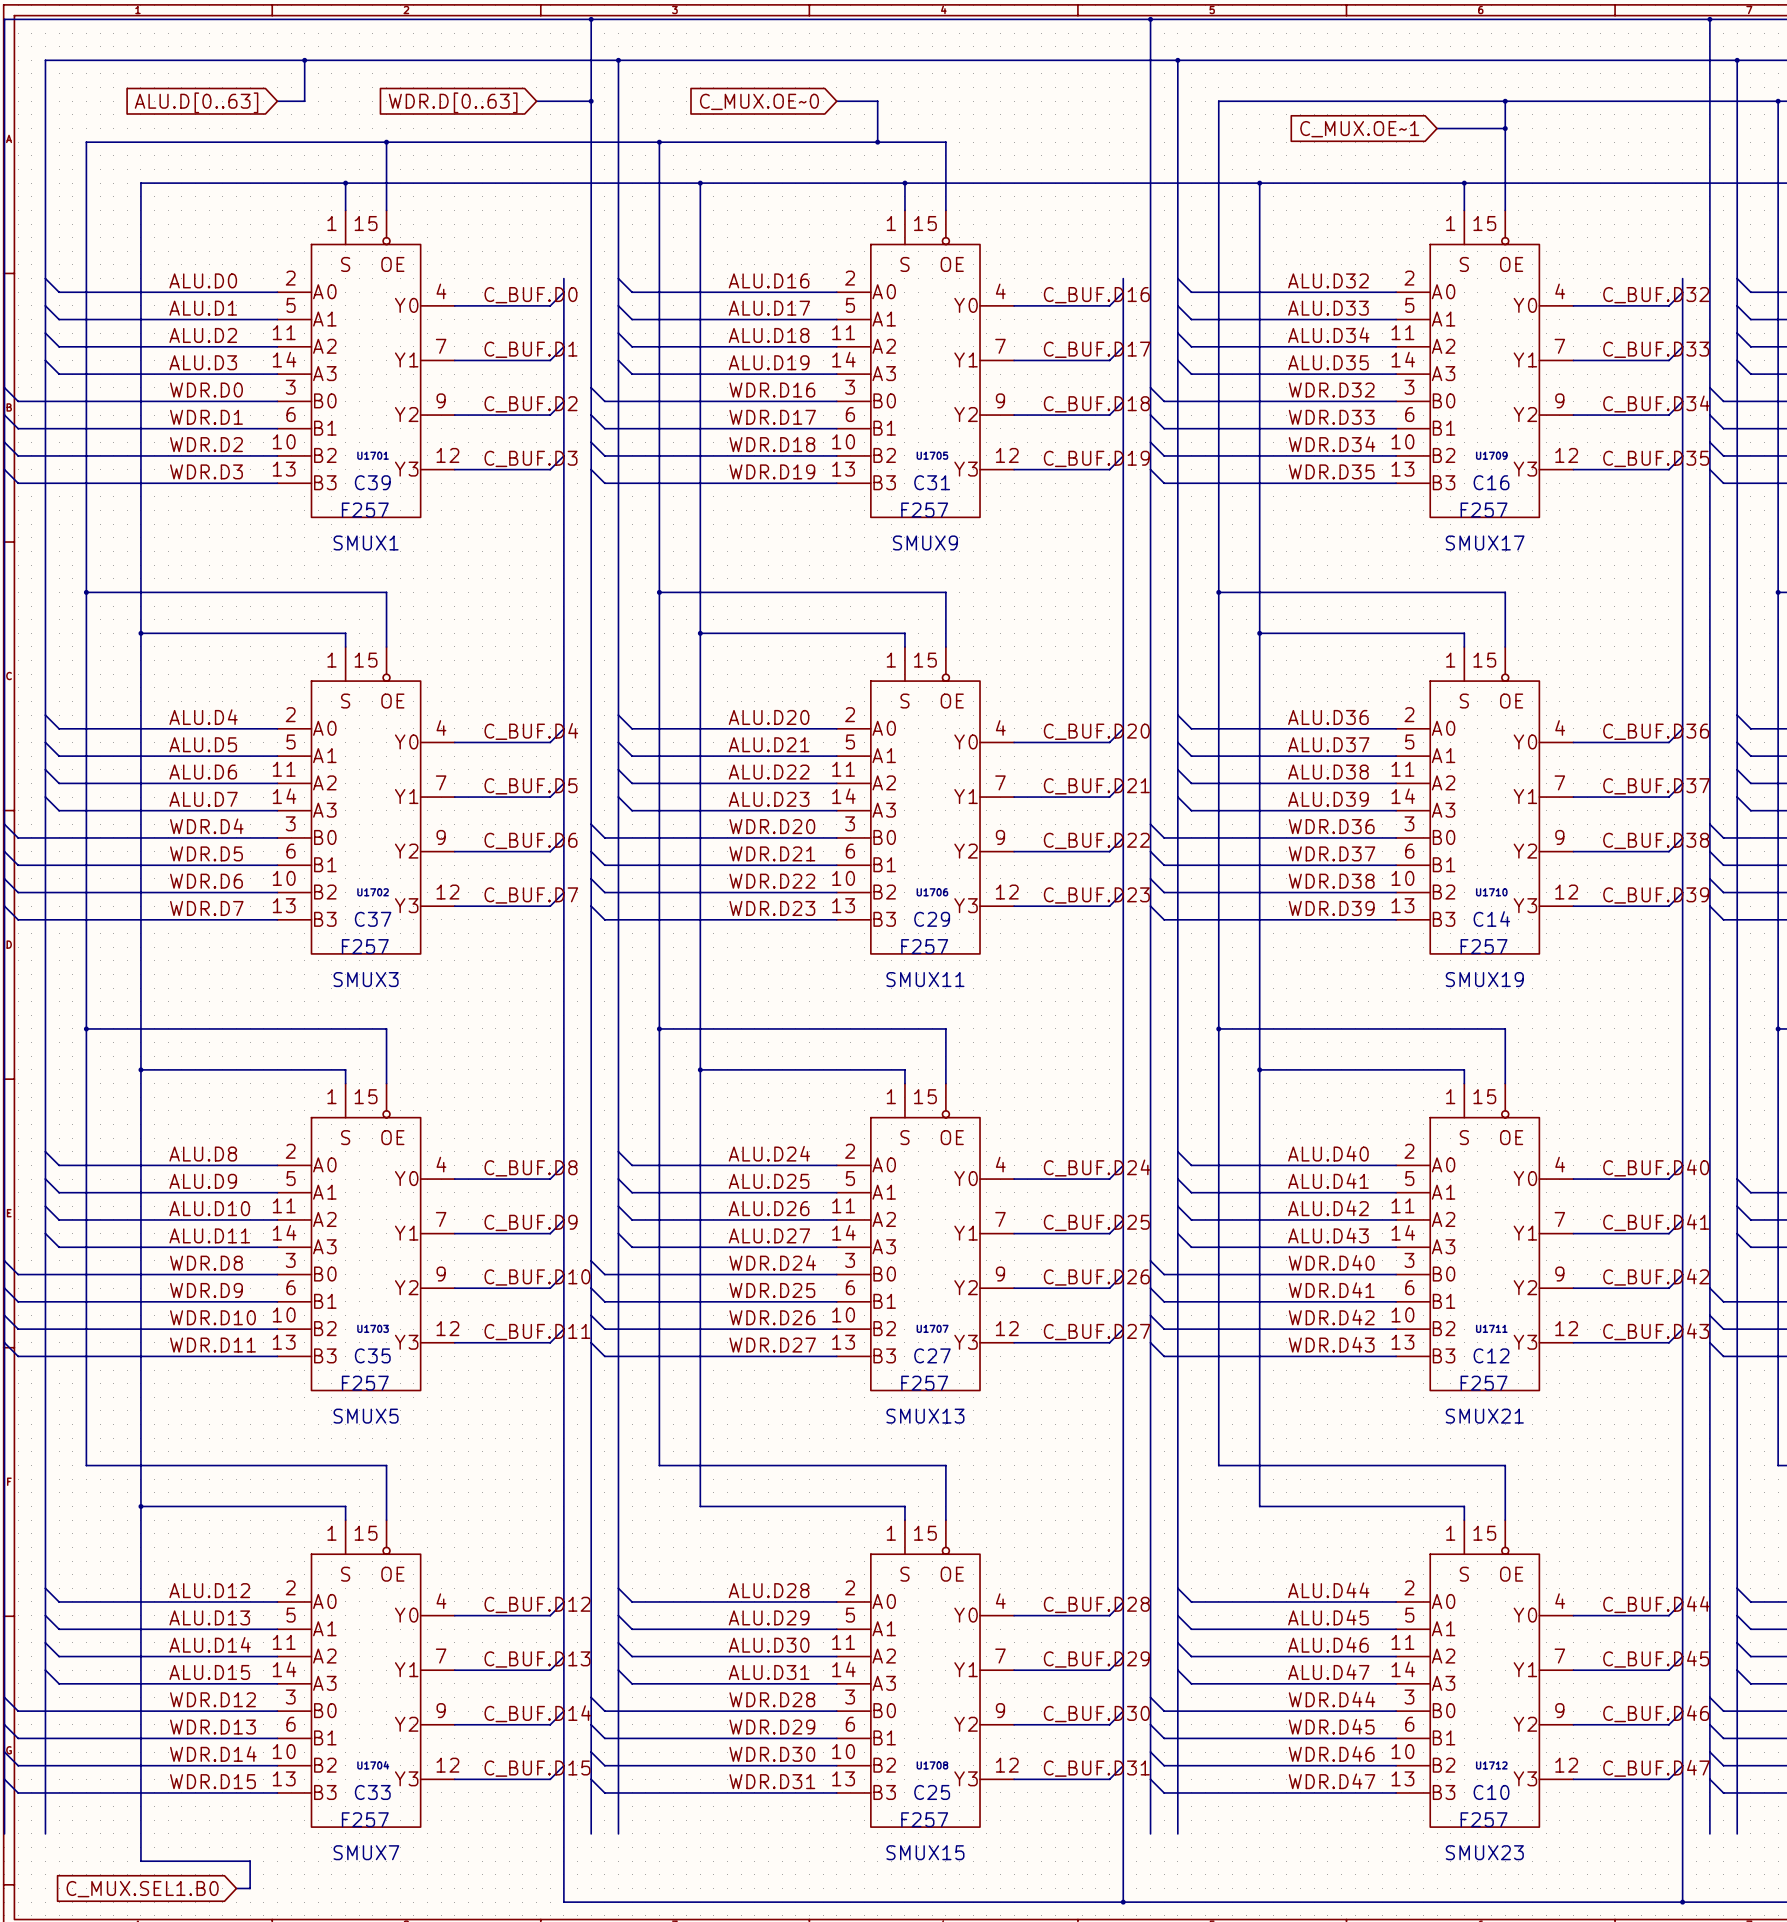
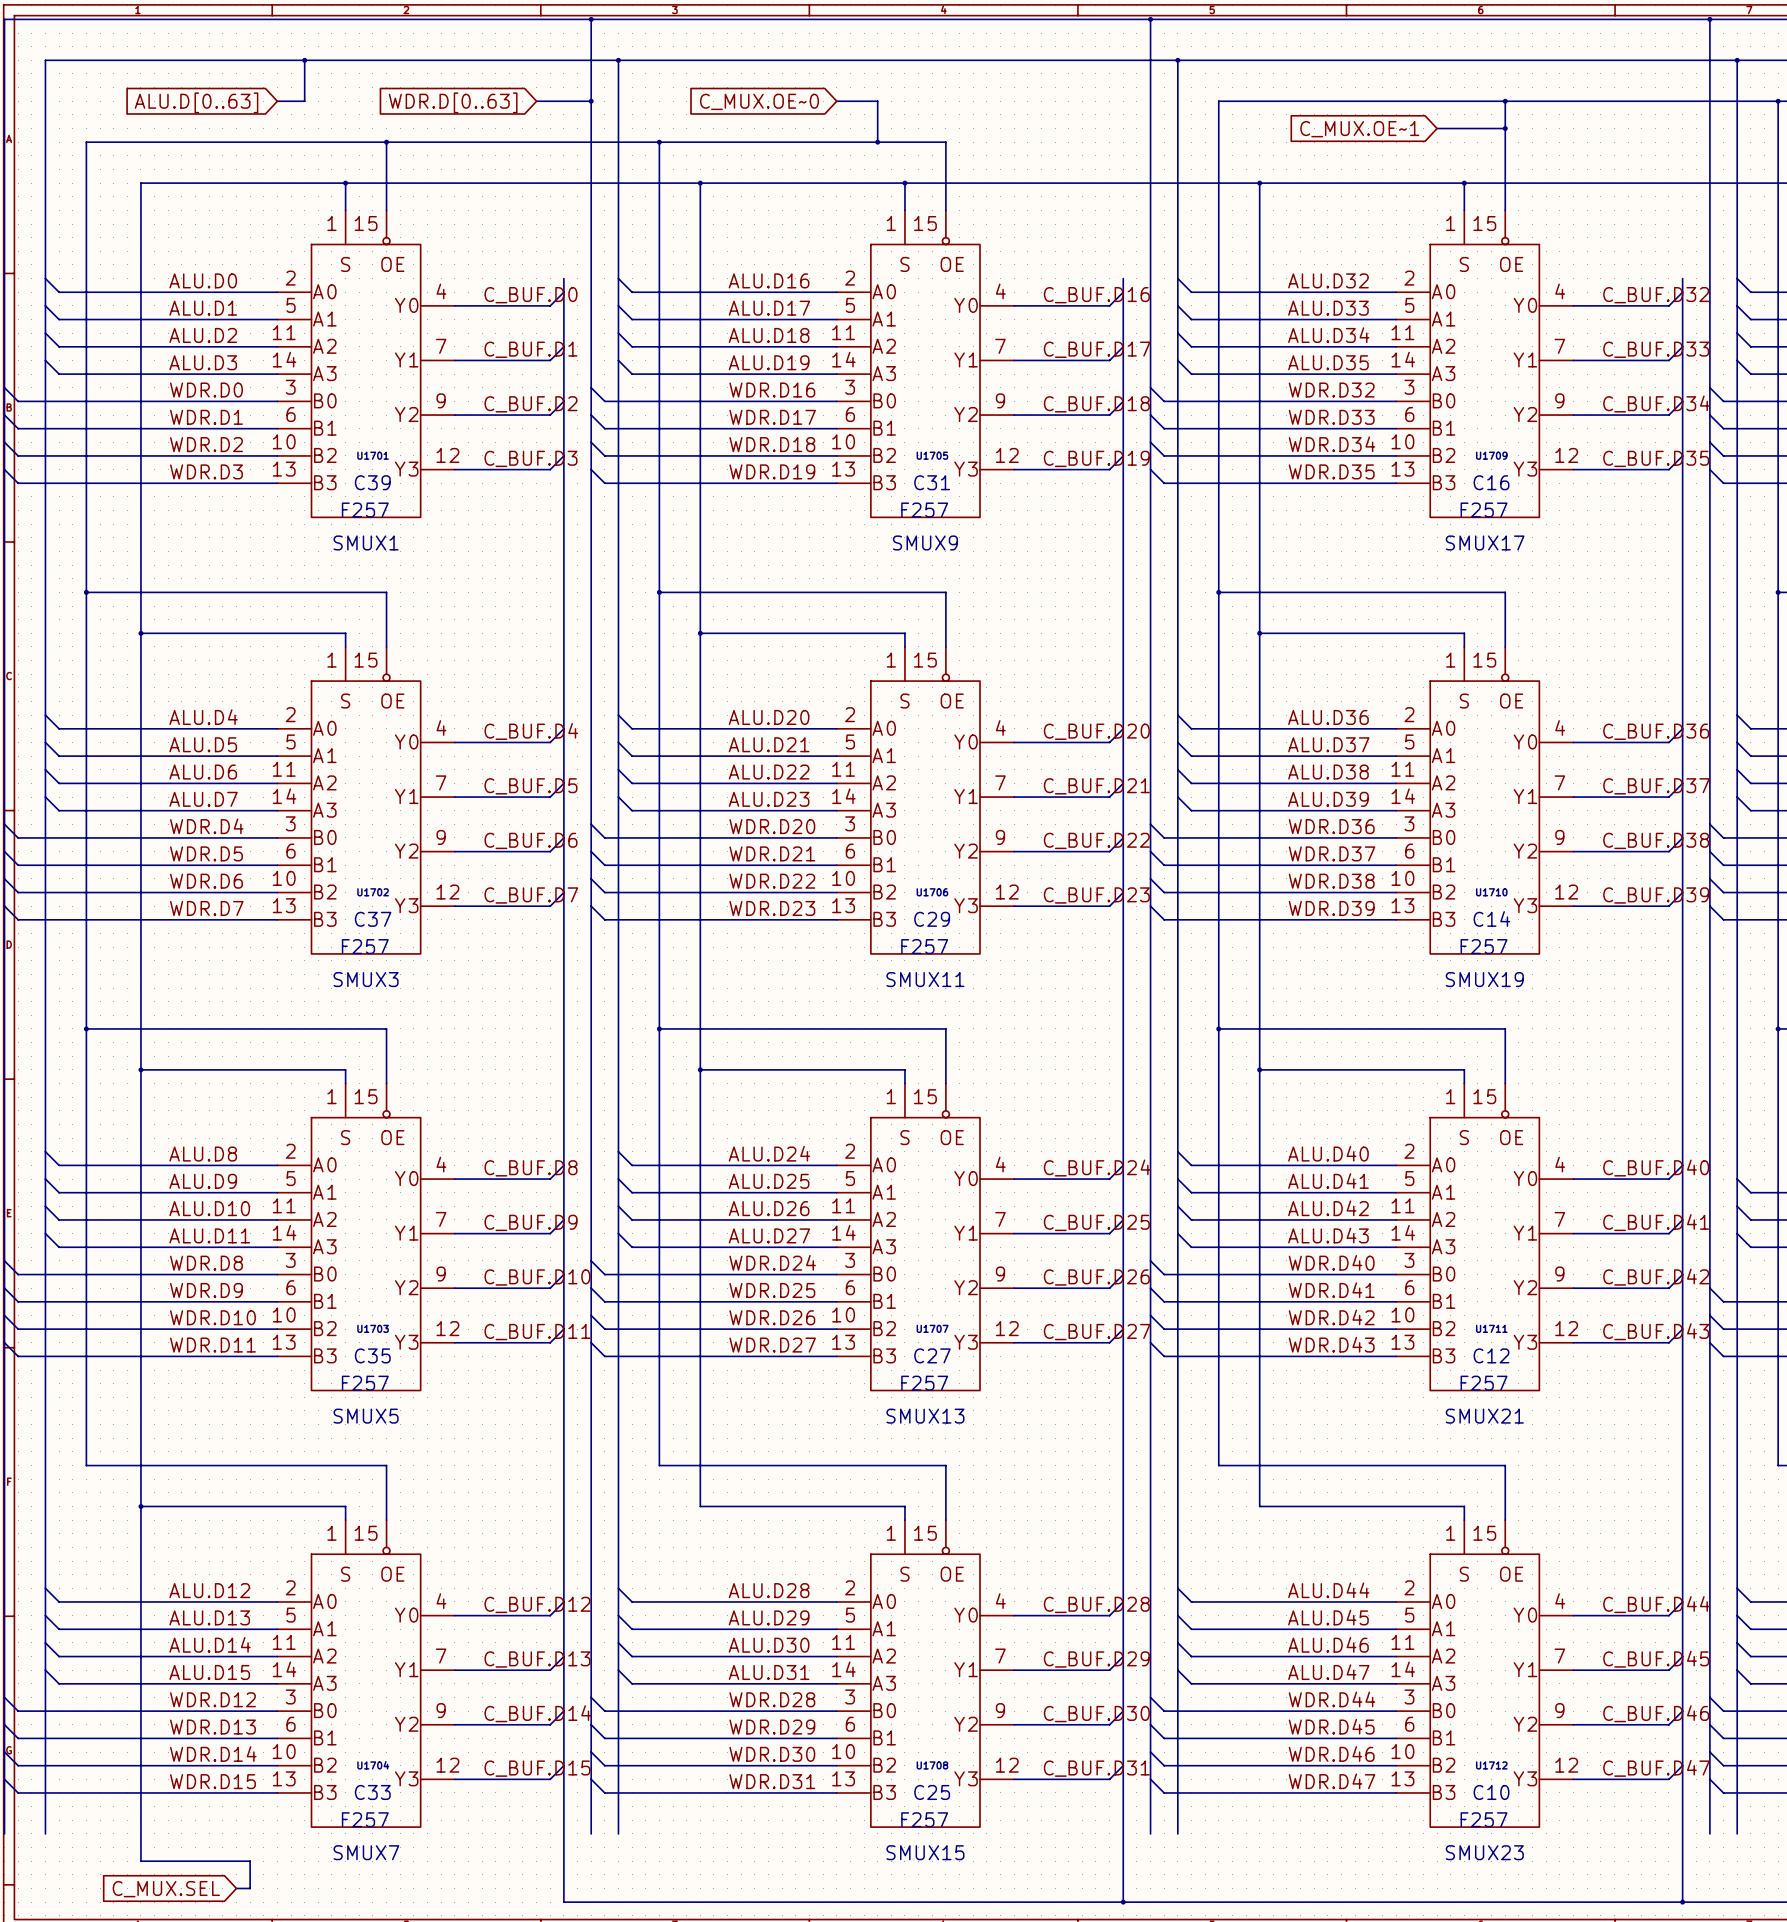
global label: C_MUX.SEL1.B0 (142, 1889) -> C_MUX.SEL (166, 1889)

